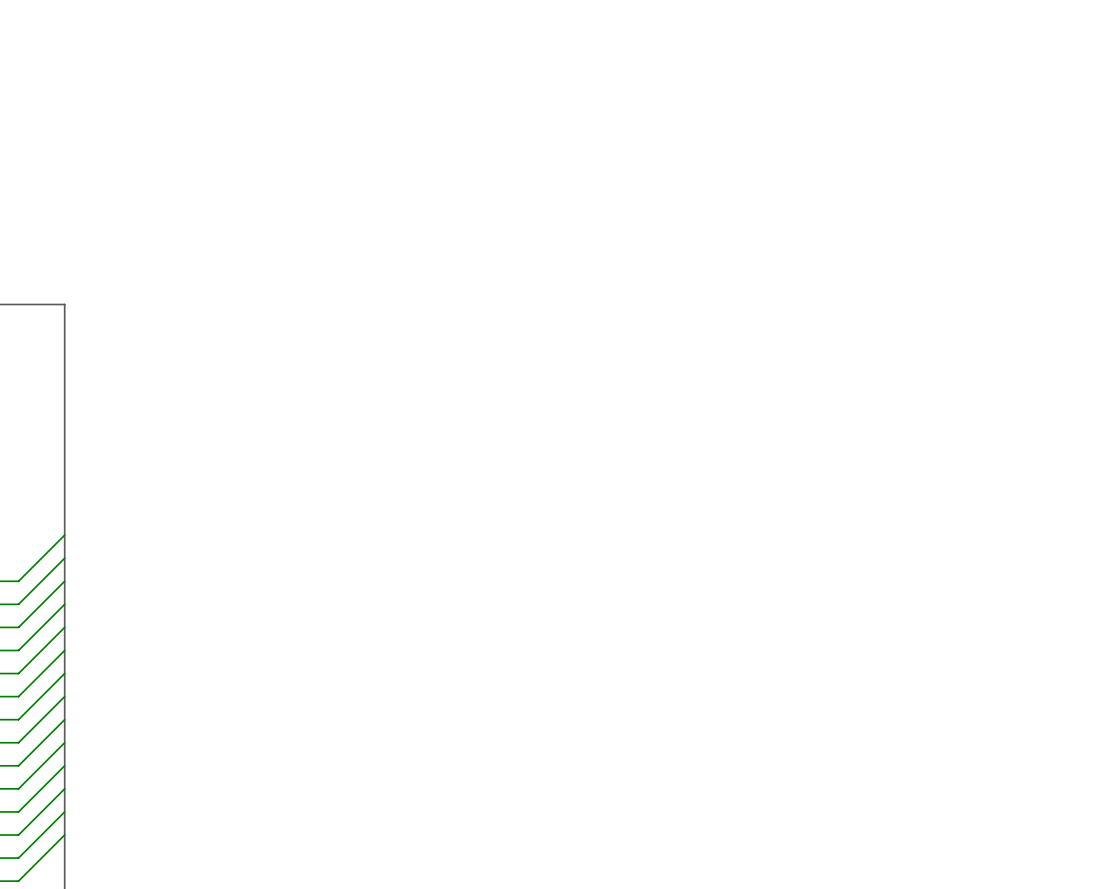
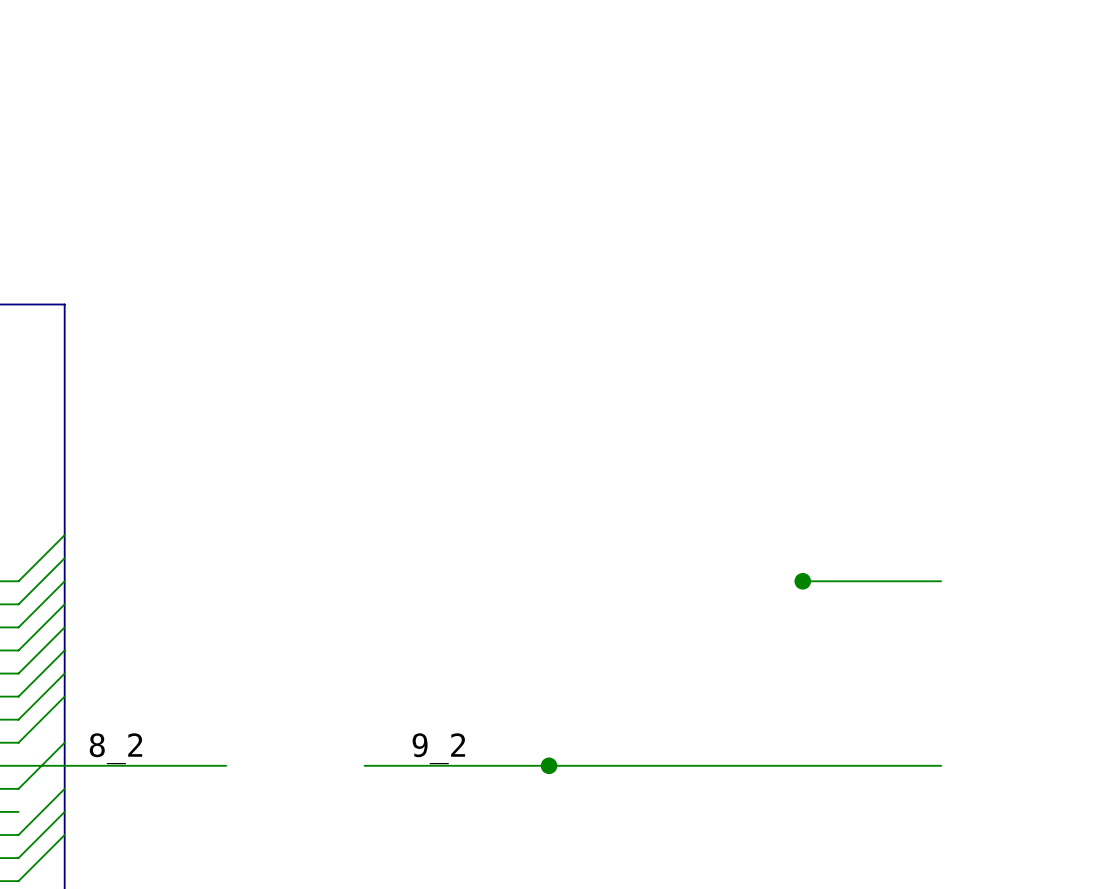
wire: none -> (802, 581) (941, 581)
junction: none -> (802, 581)
wire: (64, 719) (18, 765) -> (226, 765) (18, 765)
label: none -> 8_2 (115, 748)
label: none -> 9_2 (438, 748)
wire: (64, 765) (18, 811) -> none
wire: none -> (364, 765) (941, 765)
junction: none -> (549, 765)

